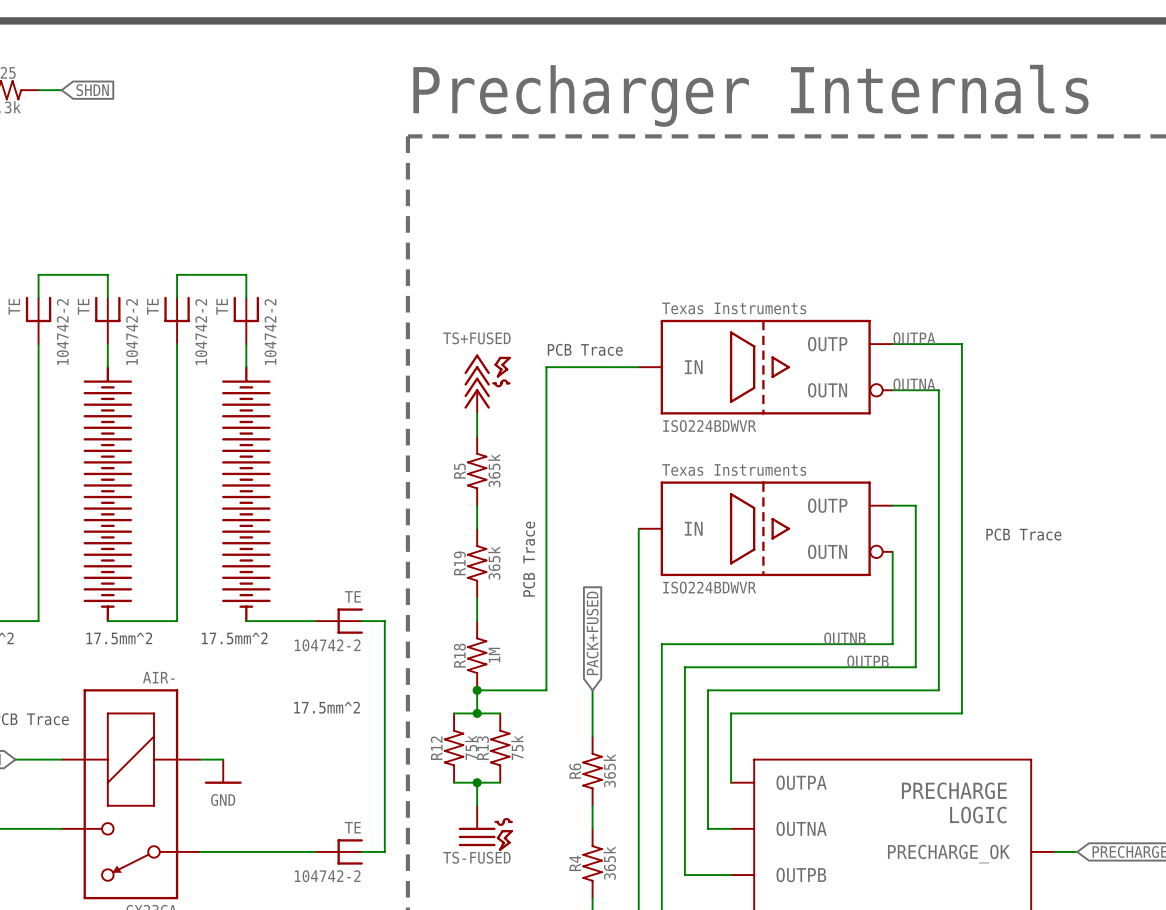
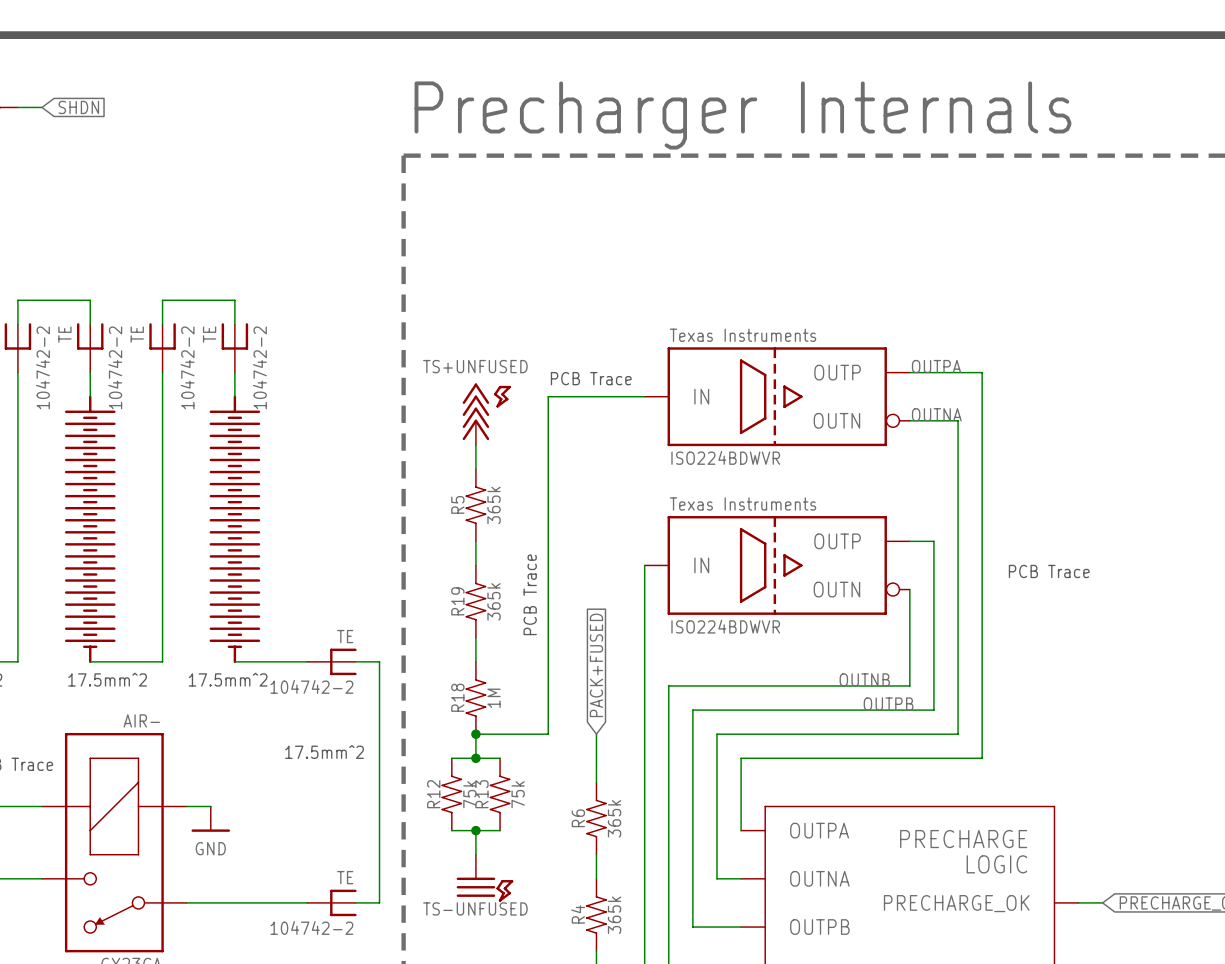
power symbol: TS+FUSED (487, 383) -> TS+UNFUSED (486, 414)
power symbol: TS-FUSED (485, 828) -> TS-UNFUSED (484, 878)

